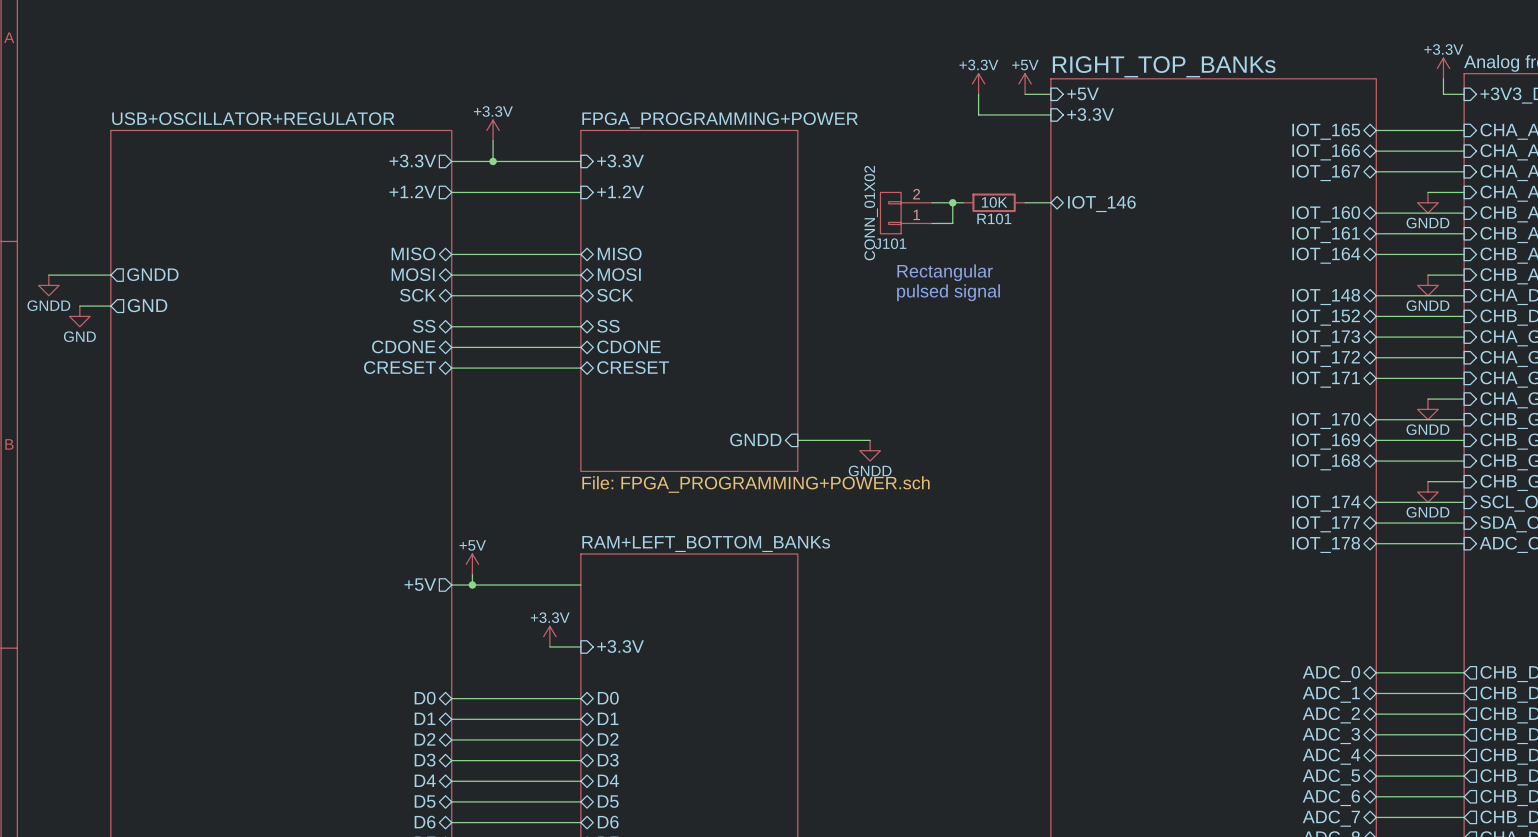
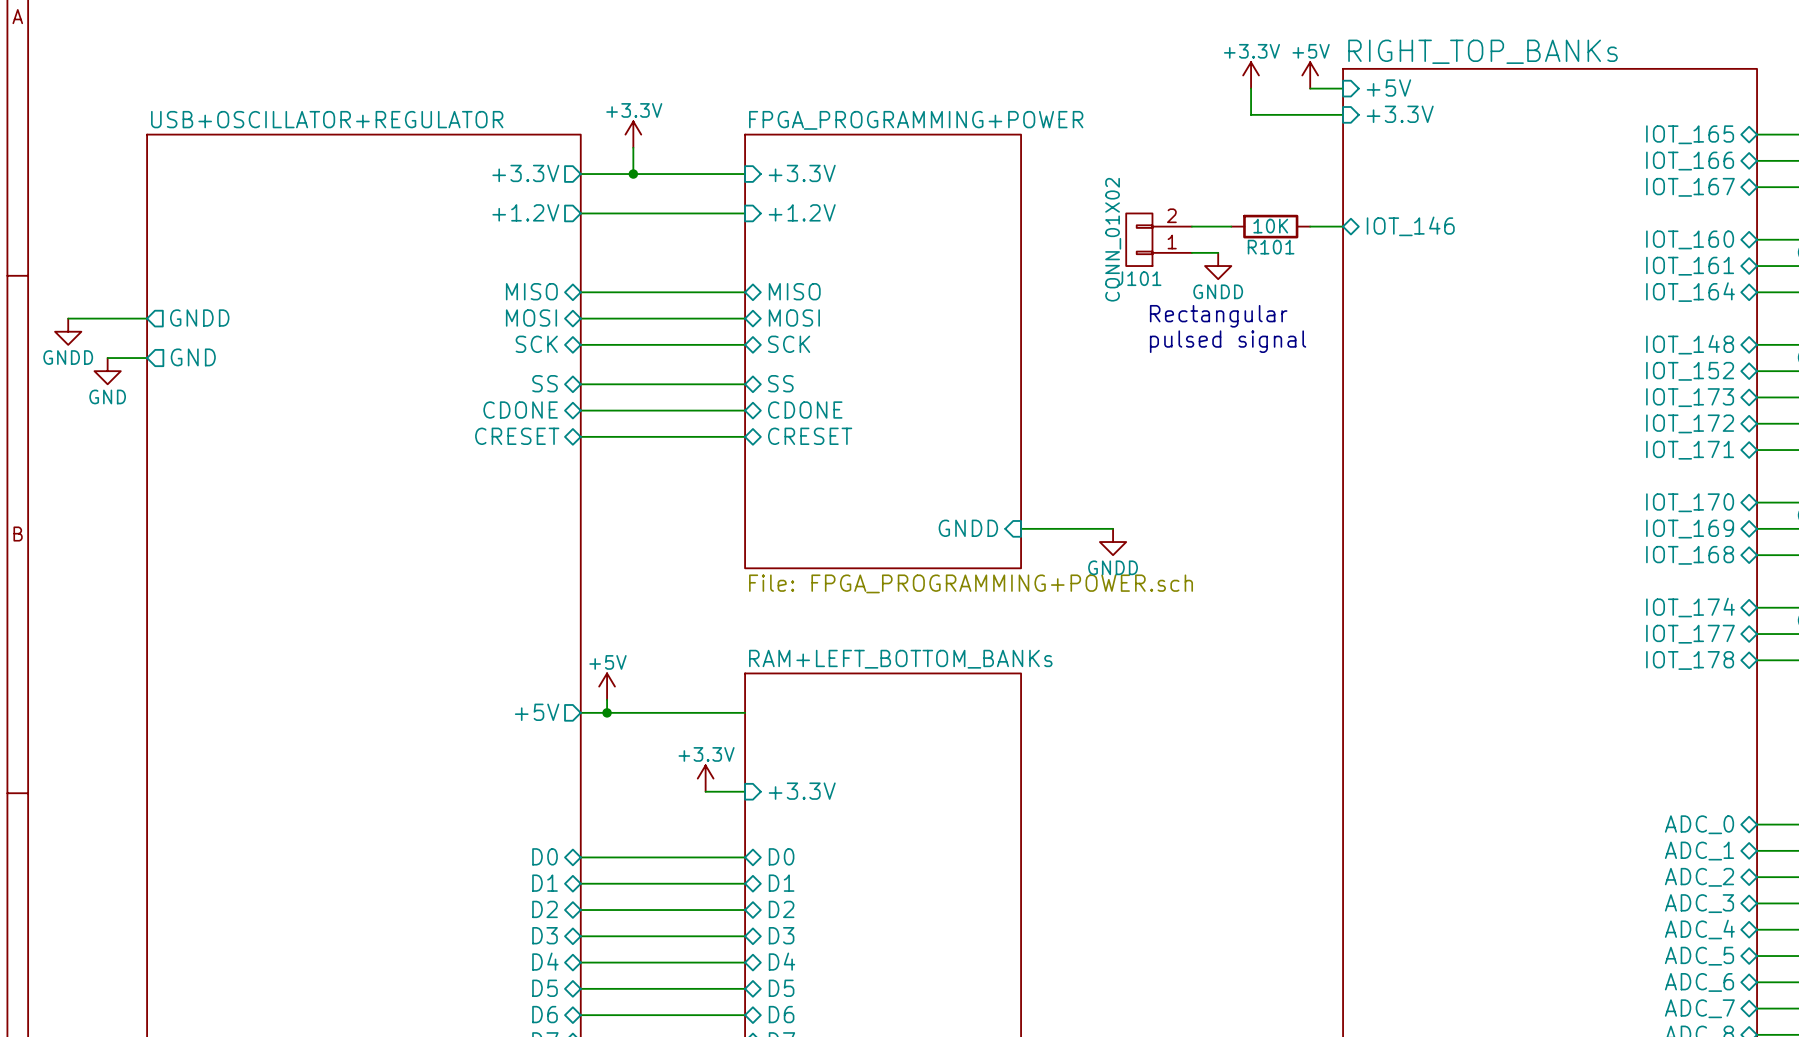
wire: (952, 202) (952, 223) -> none
junction: (952, 202) -> none
power symbol: none -> GNDD (1218, 266)

